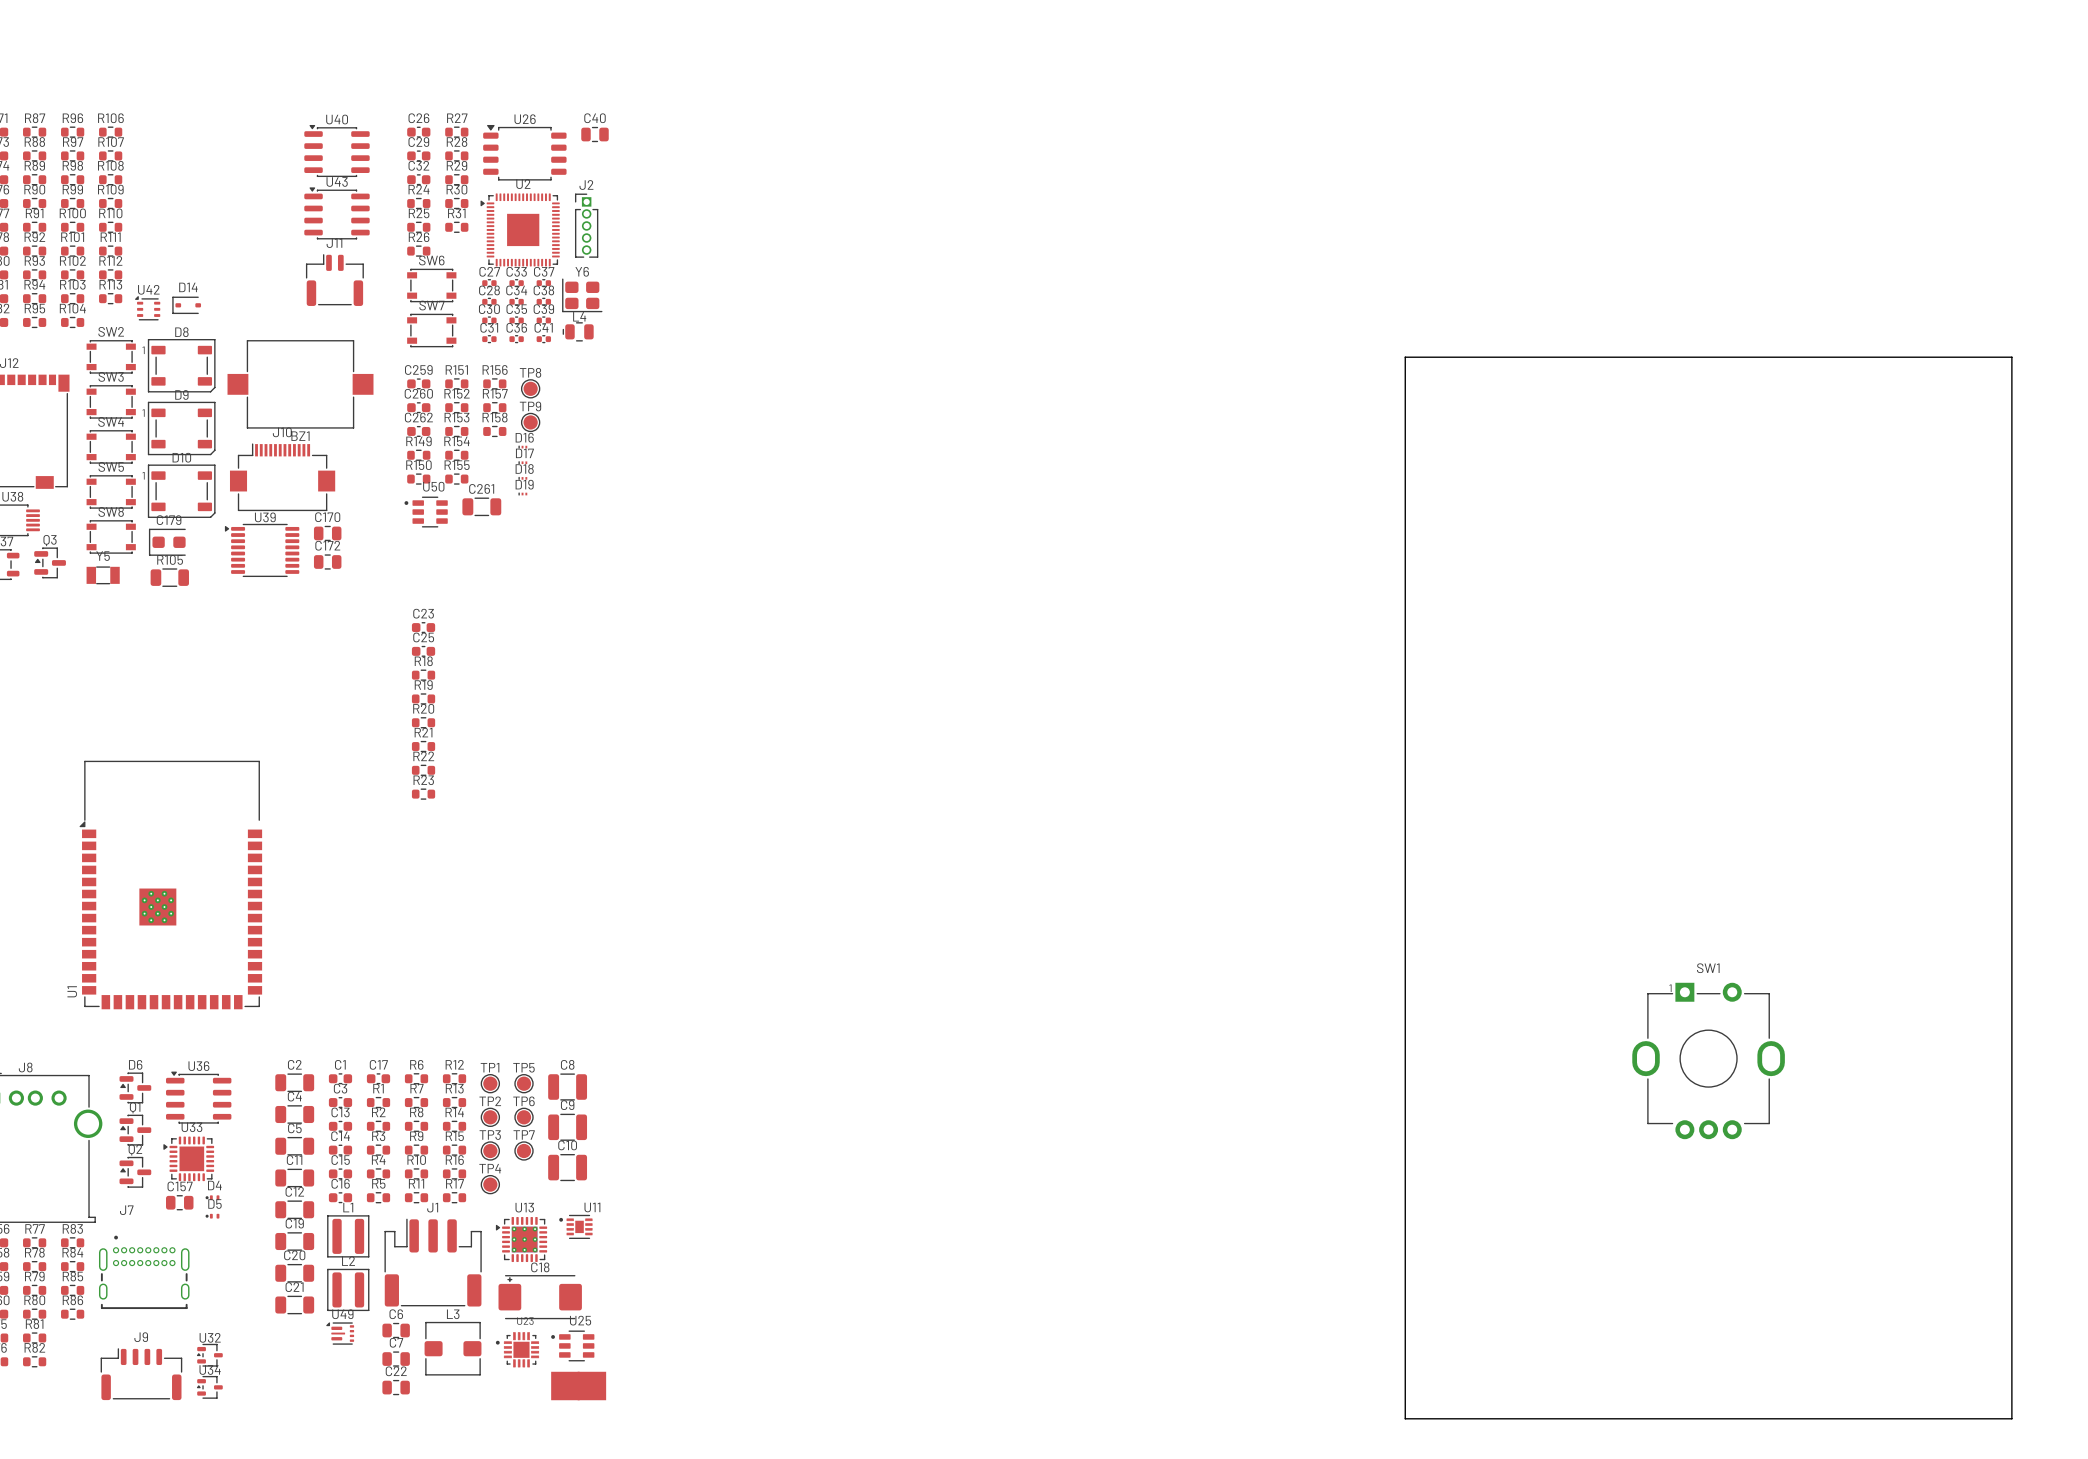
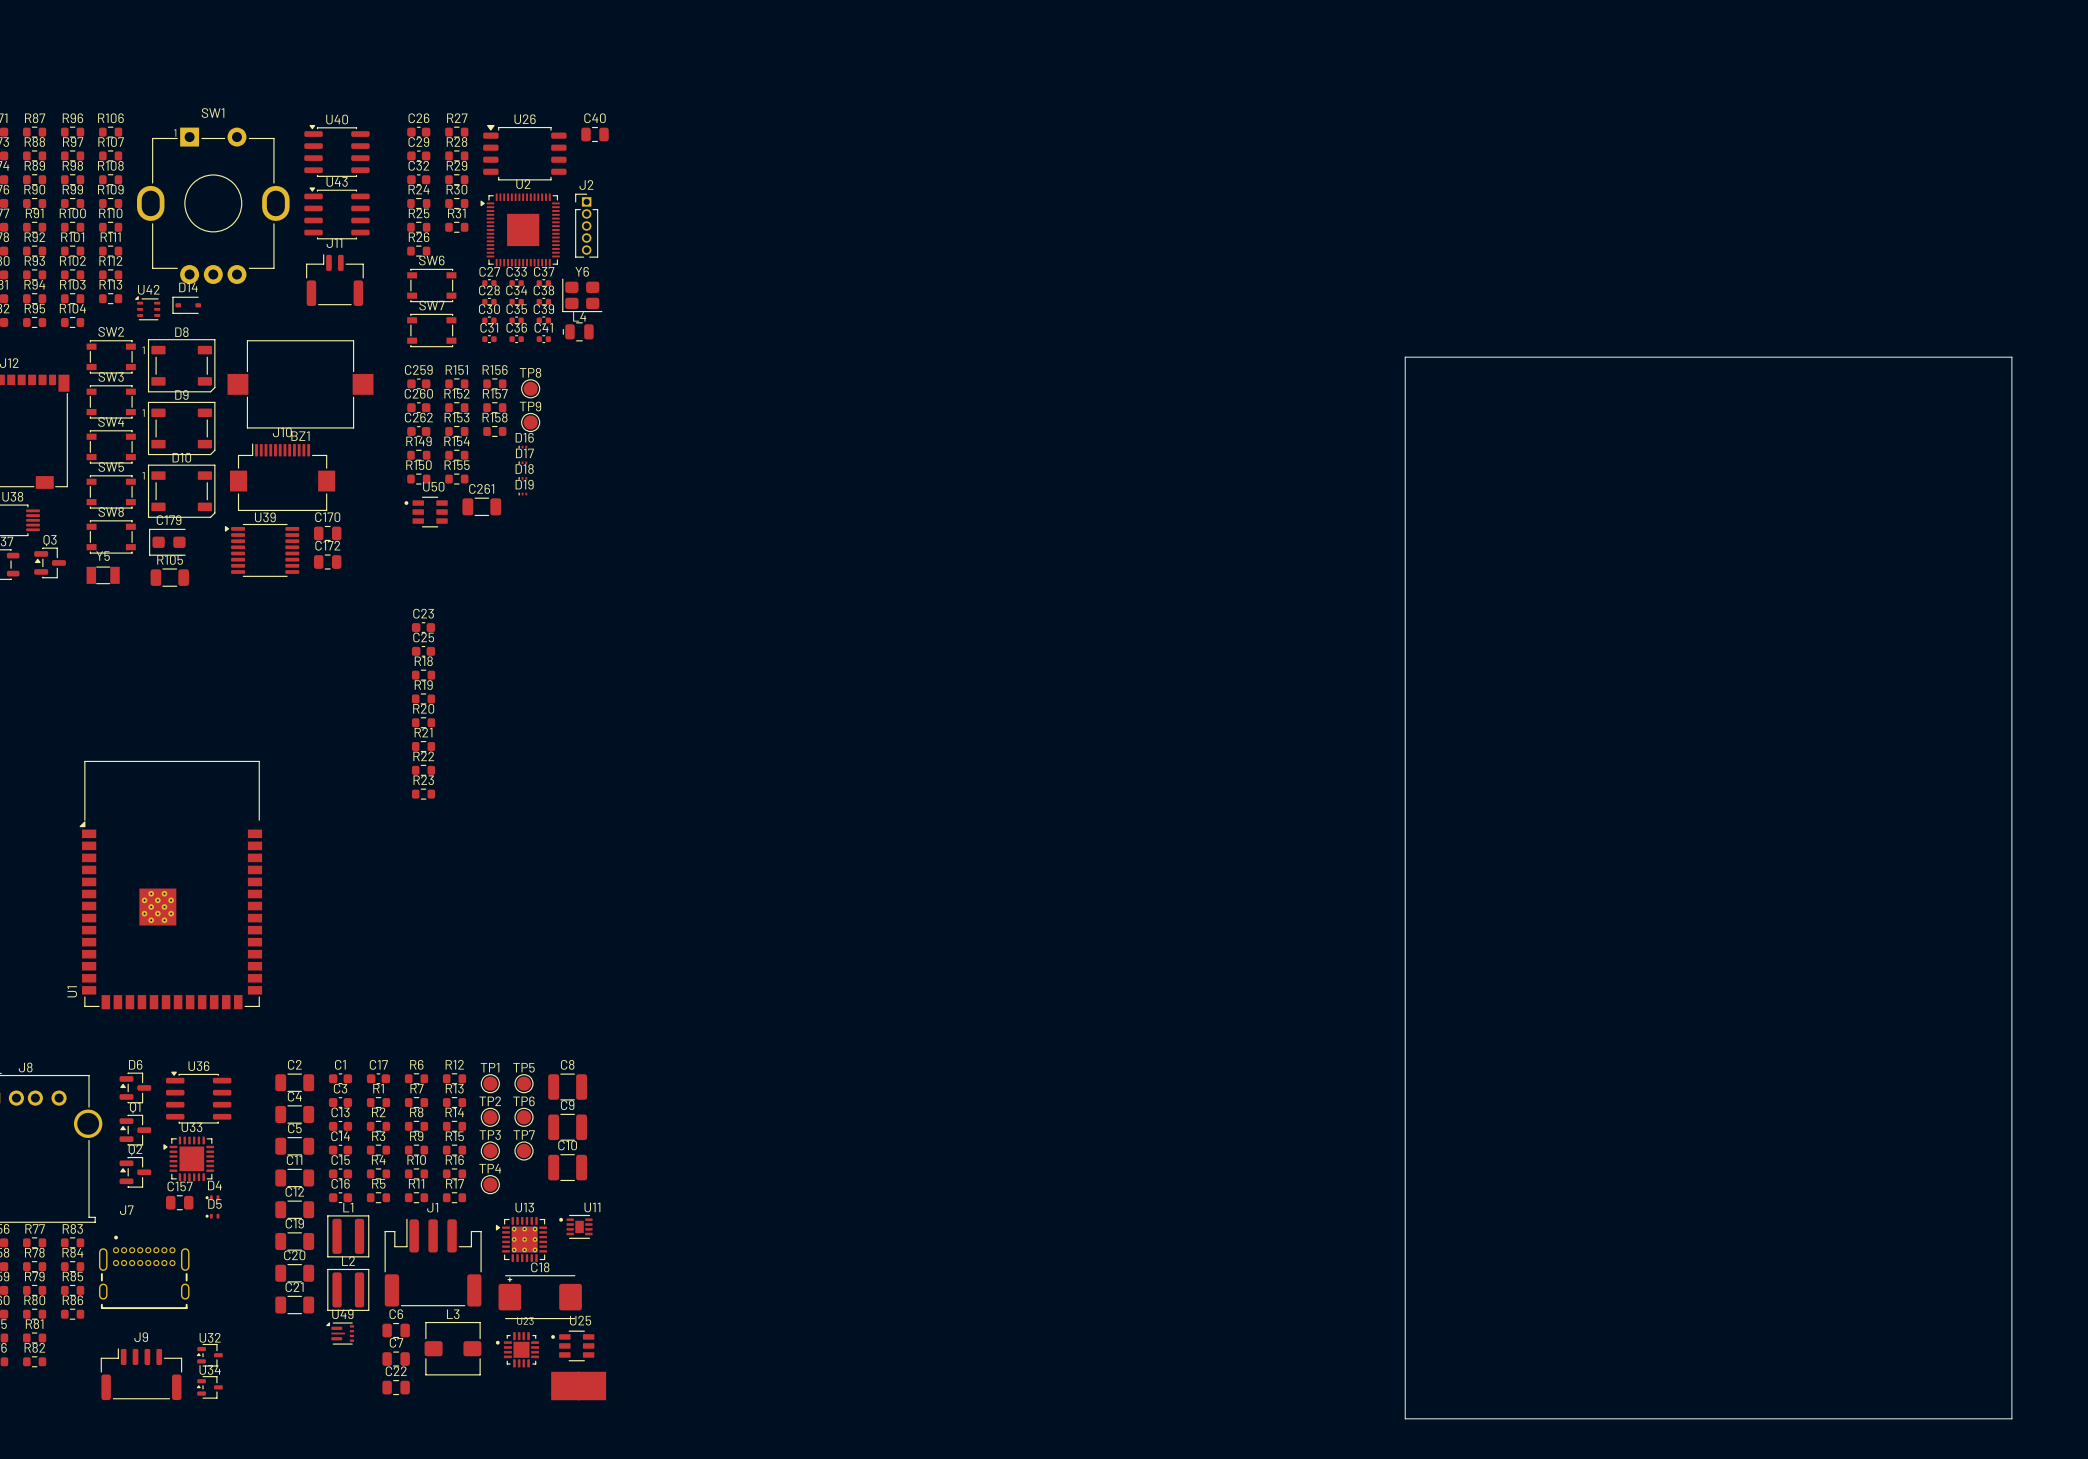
SW1 position: (1708, 1060) -> (213, 205)

